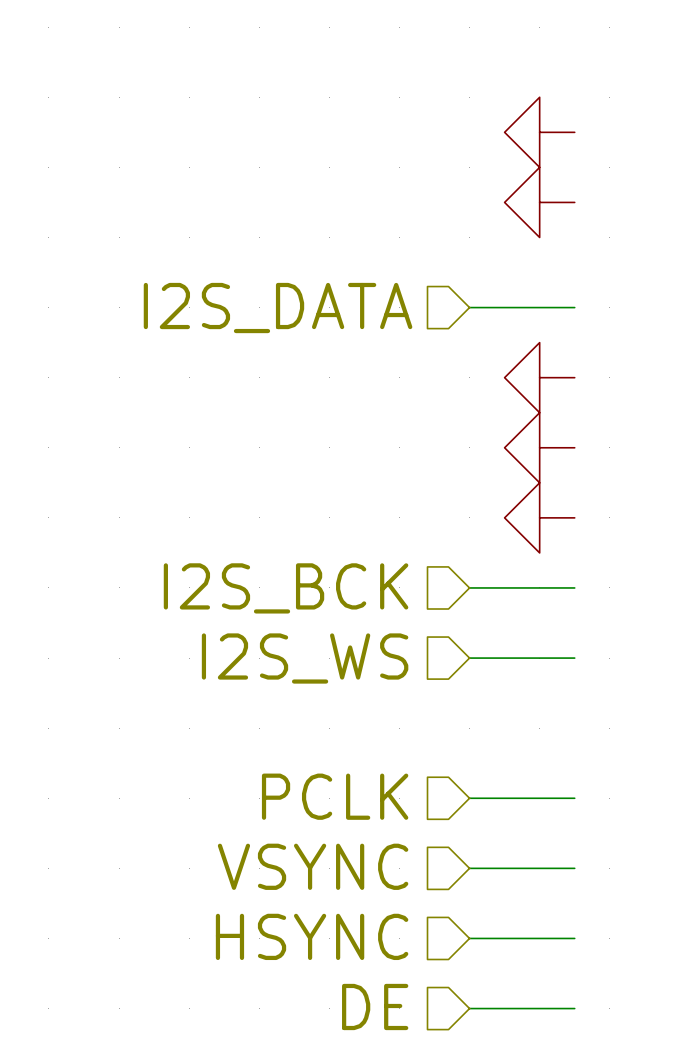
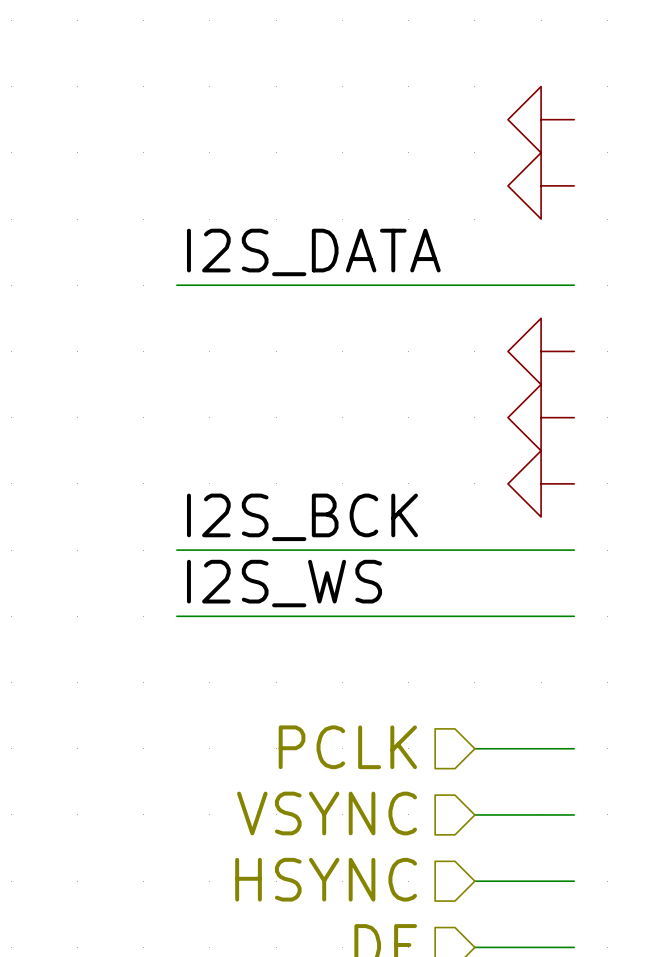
label: none -> I2S_DATA (313, 252)
wire: none -> (176, 285) (474, 285)
hierarchical label: I2S_DATA (278, 308) -> none
label: none -> I2S_BCK (302, 517)
wire: none -> (176, 550) (474, 550)
hierarchical label: I2S_BCK (286, 588) -> none
label: none -> I2S_WS (284, 583)
wire: none -> (176, 616) (474, 616)
hierarchical label: I2S_WS (305, 658) -> none

